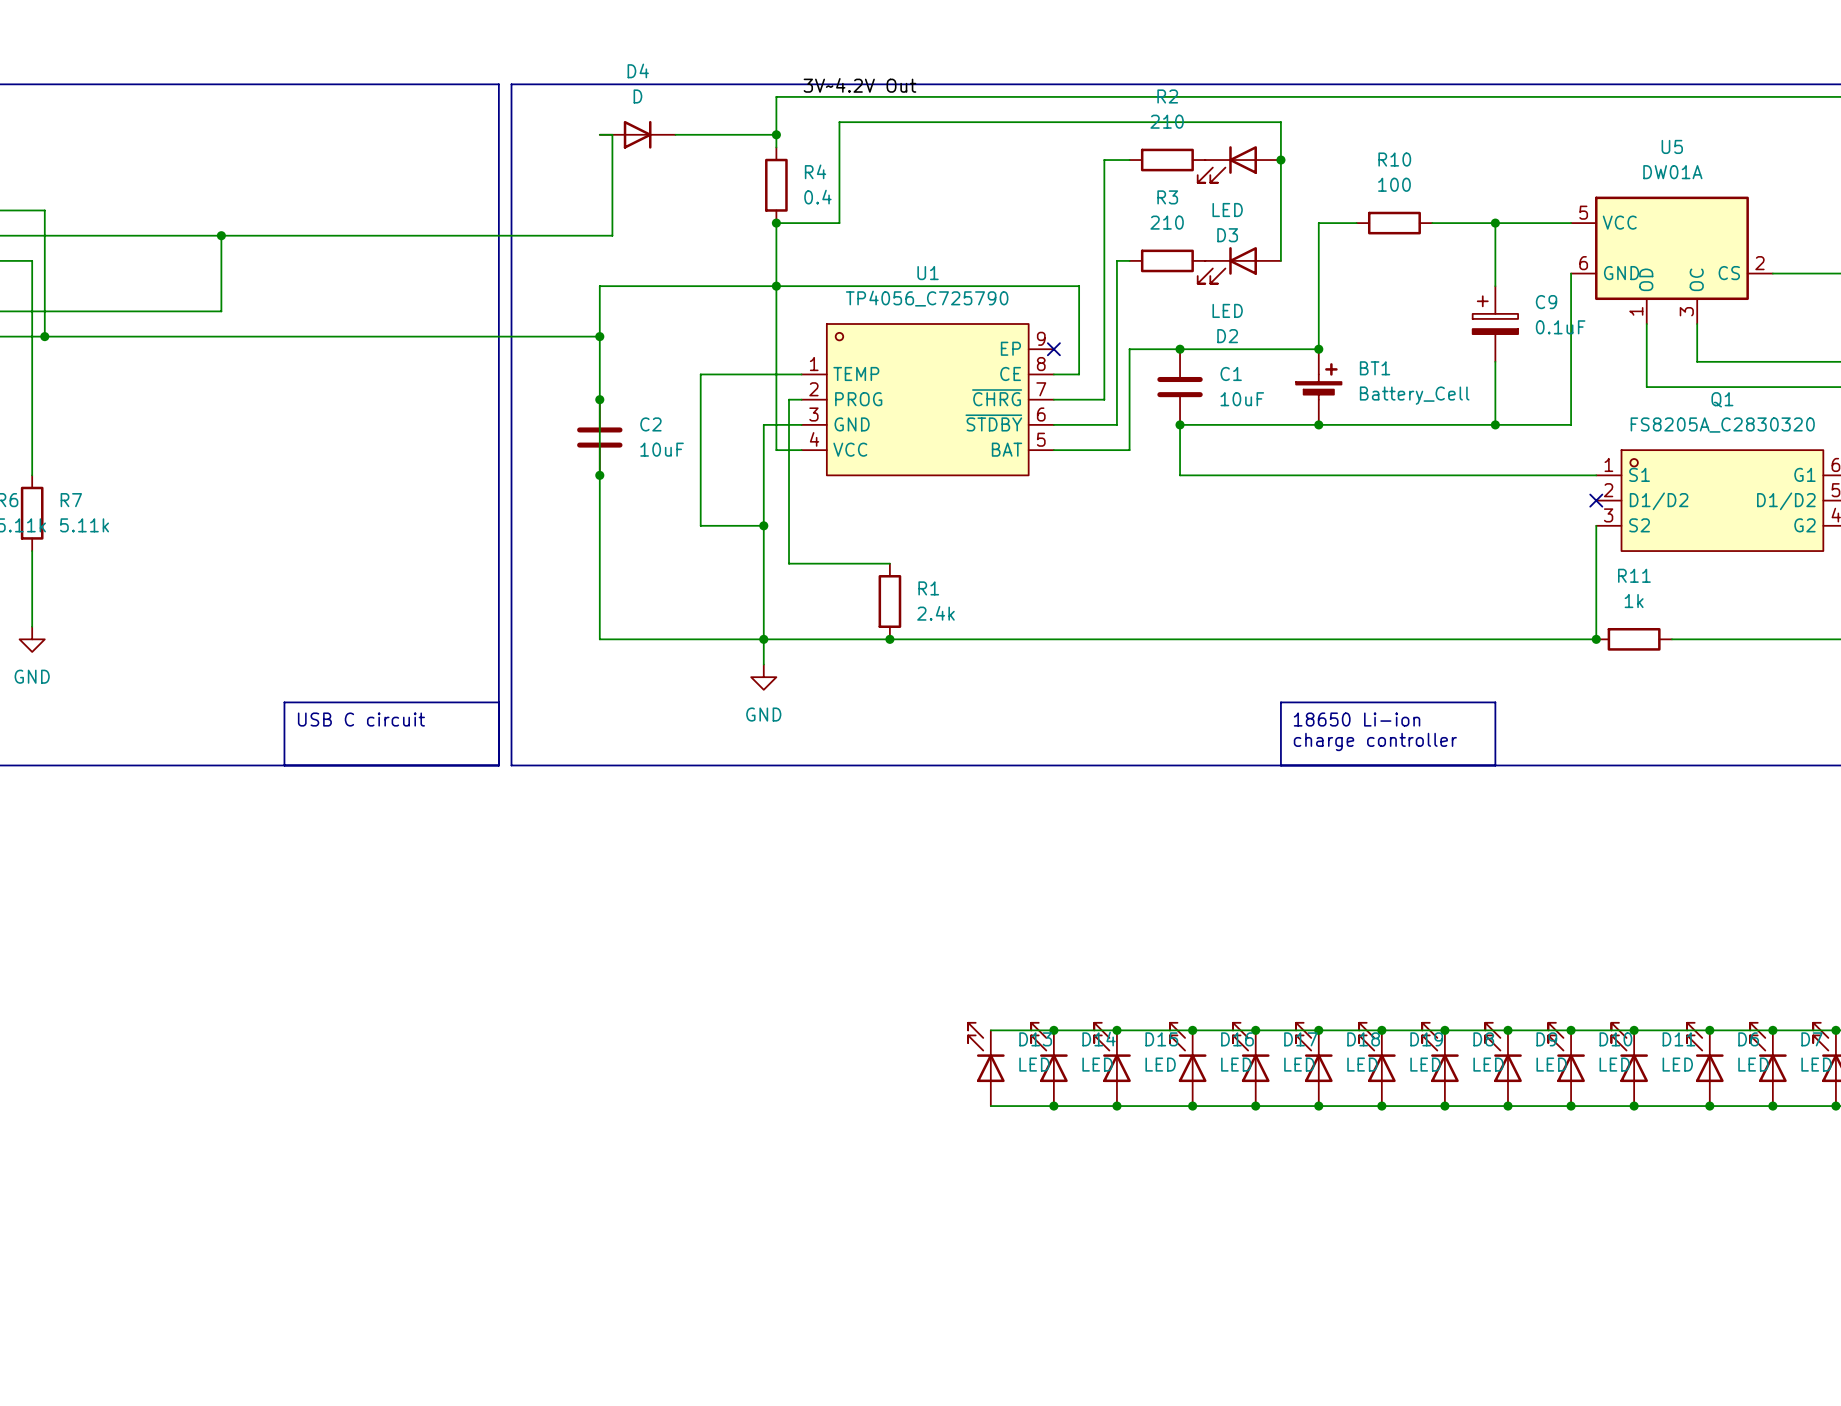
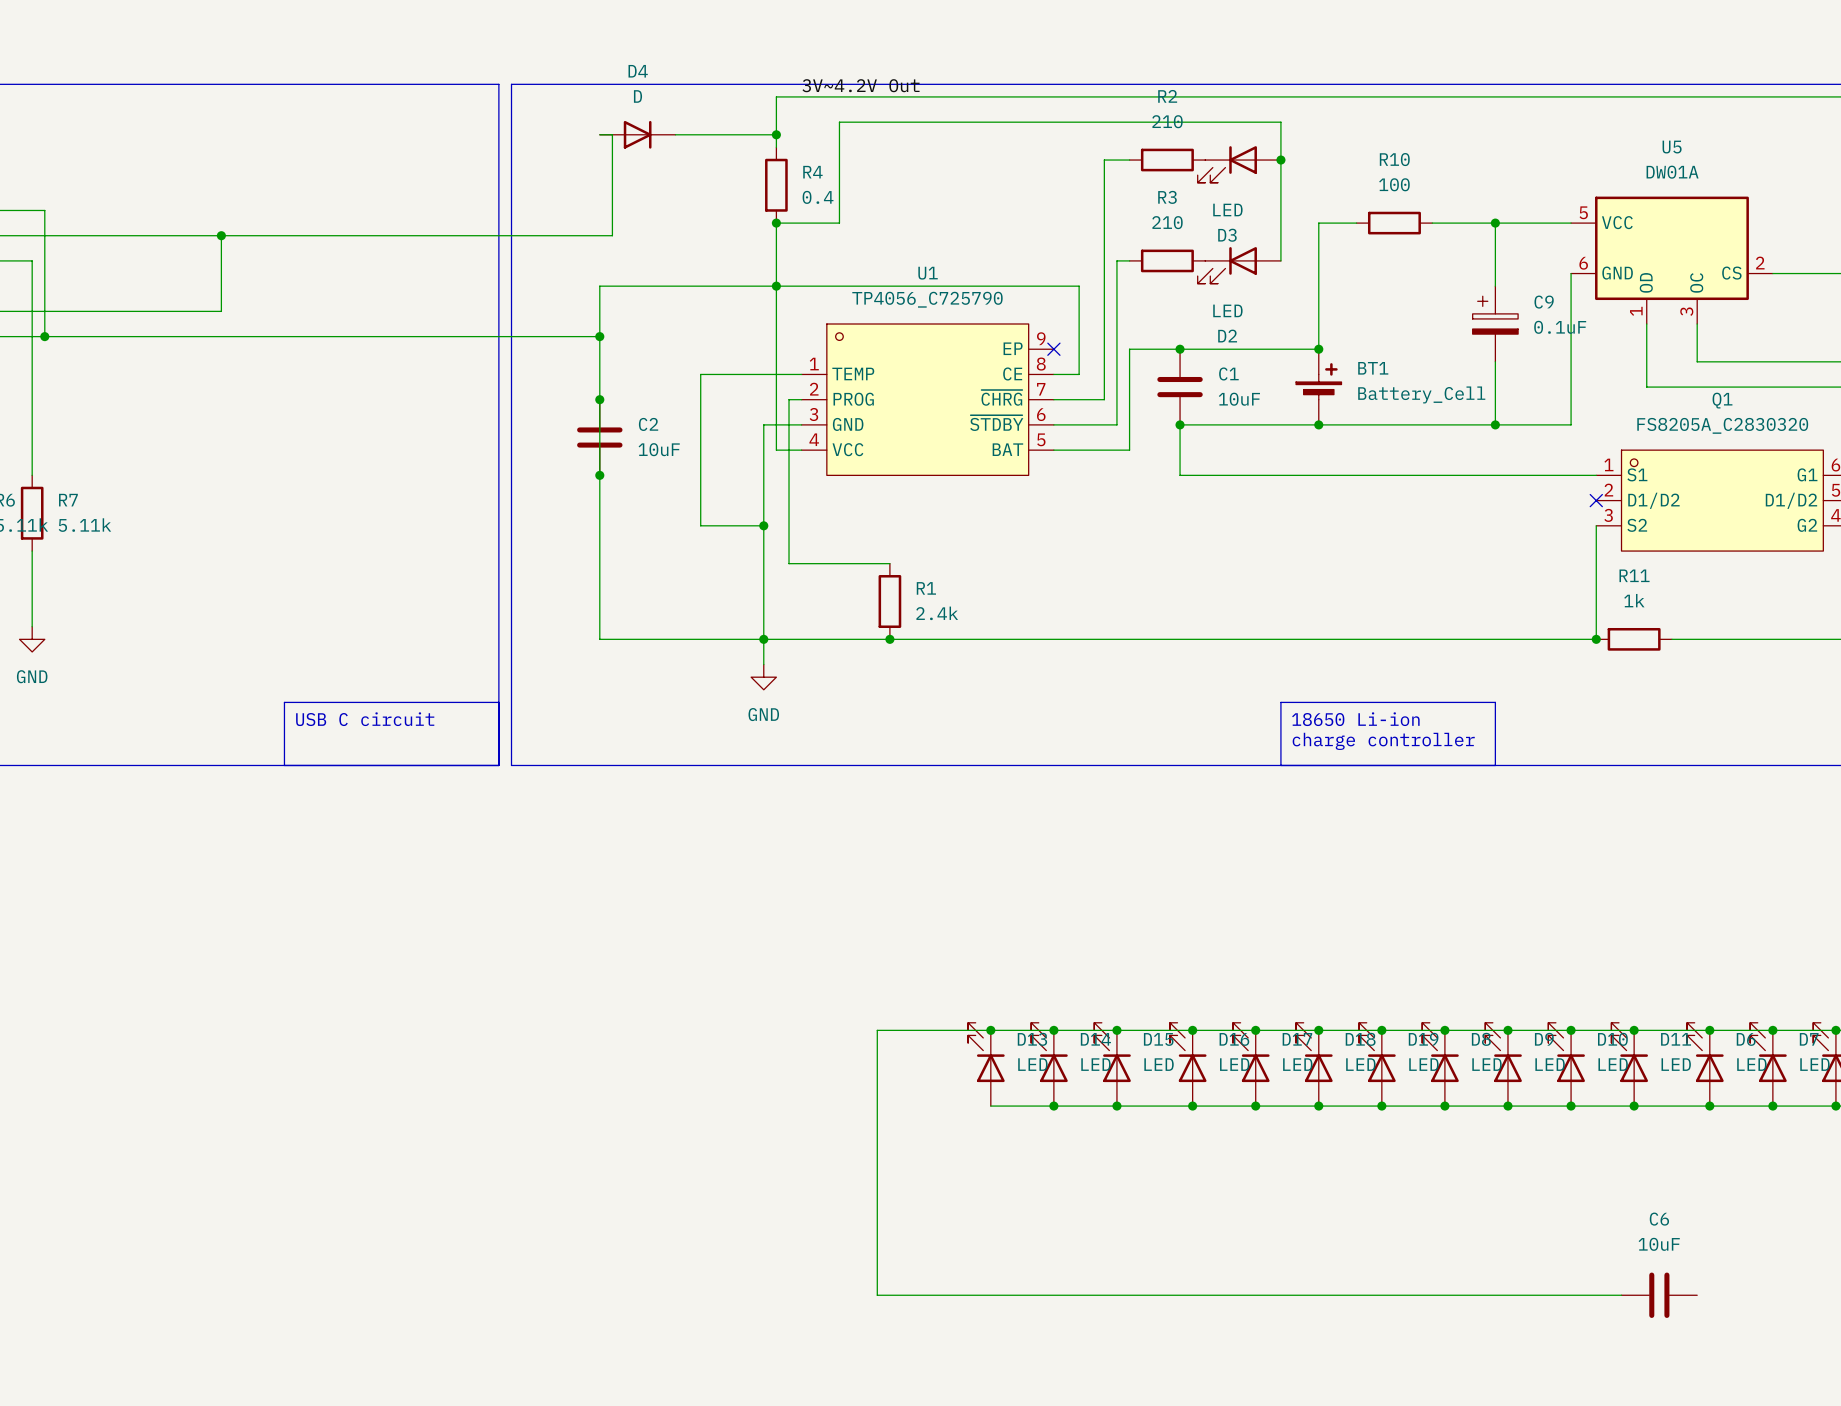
wire: none -> (990, 1030) (877, 1030) (877, 1295) (1621, 1295)
junction: none -> (990, 1030)
C6: none -> 10uF (1659, 1295)

